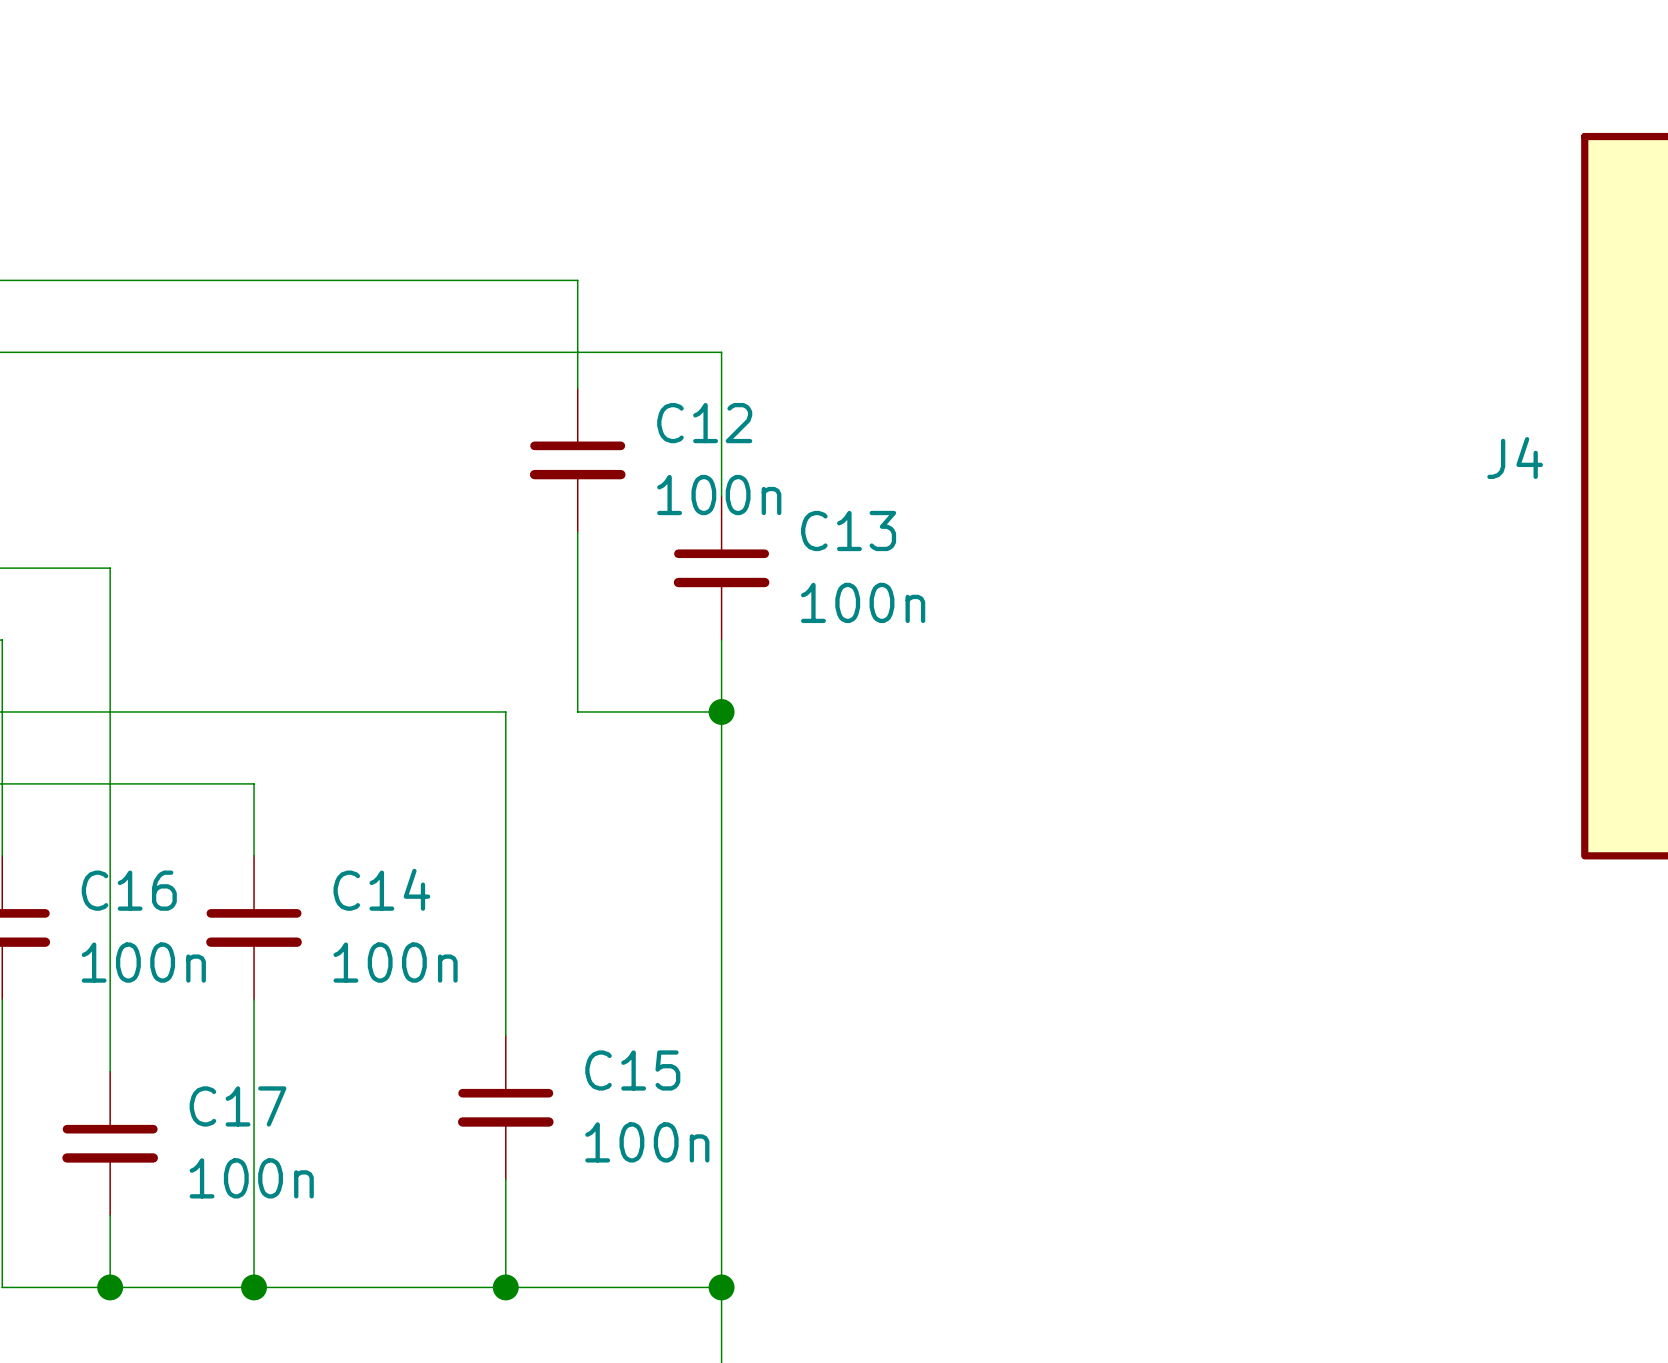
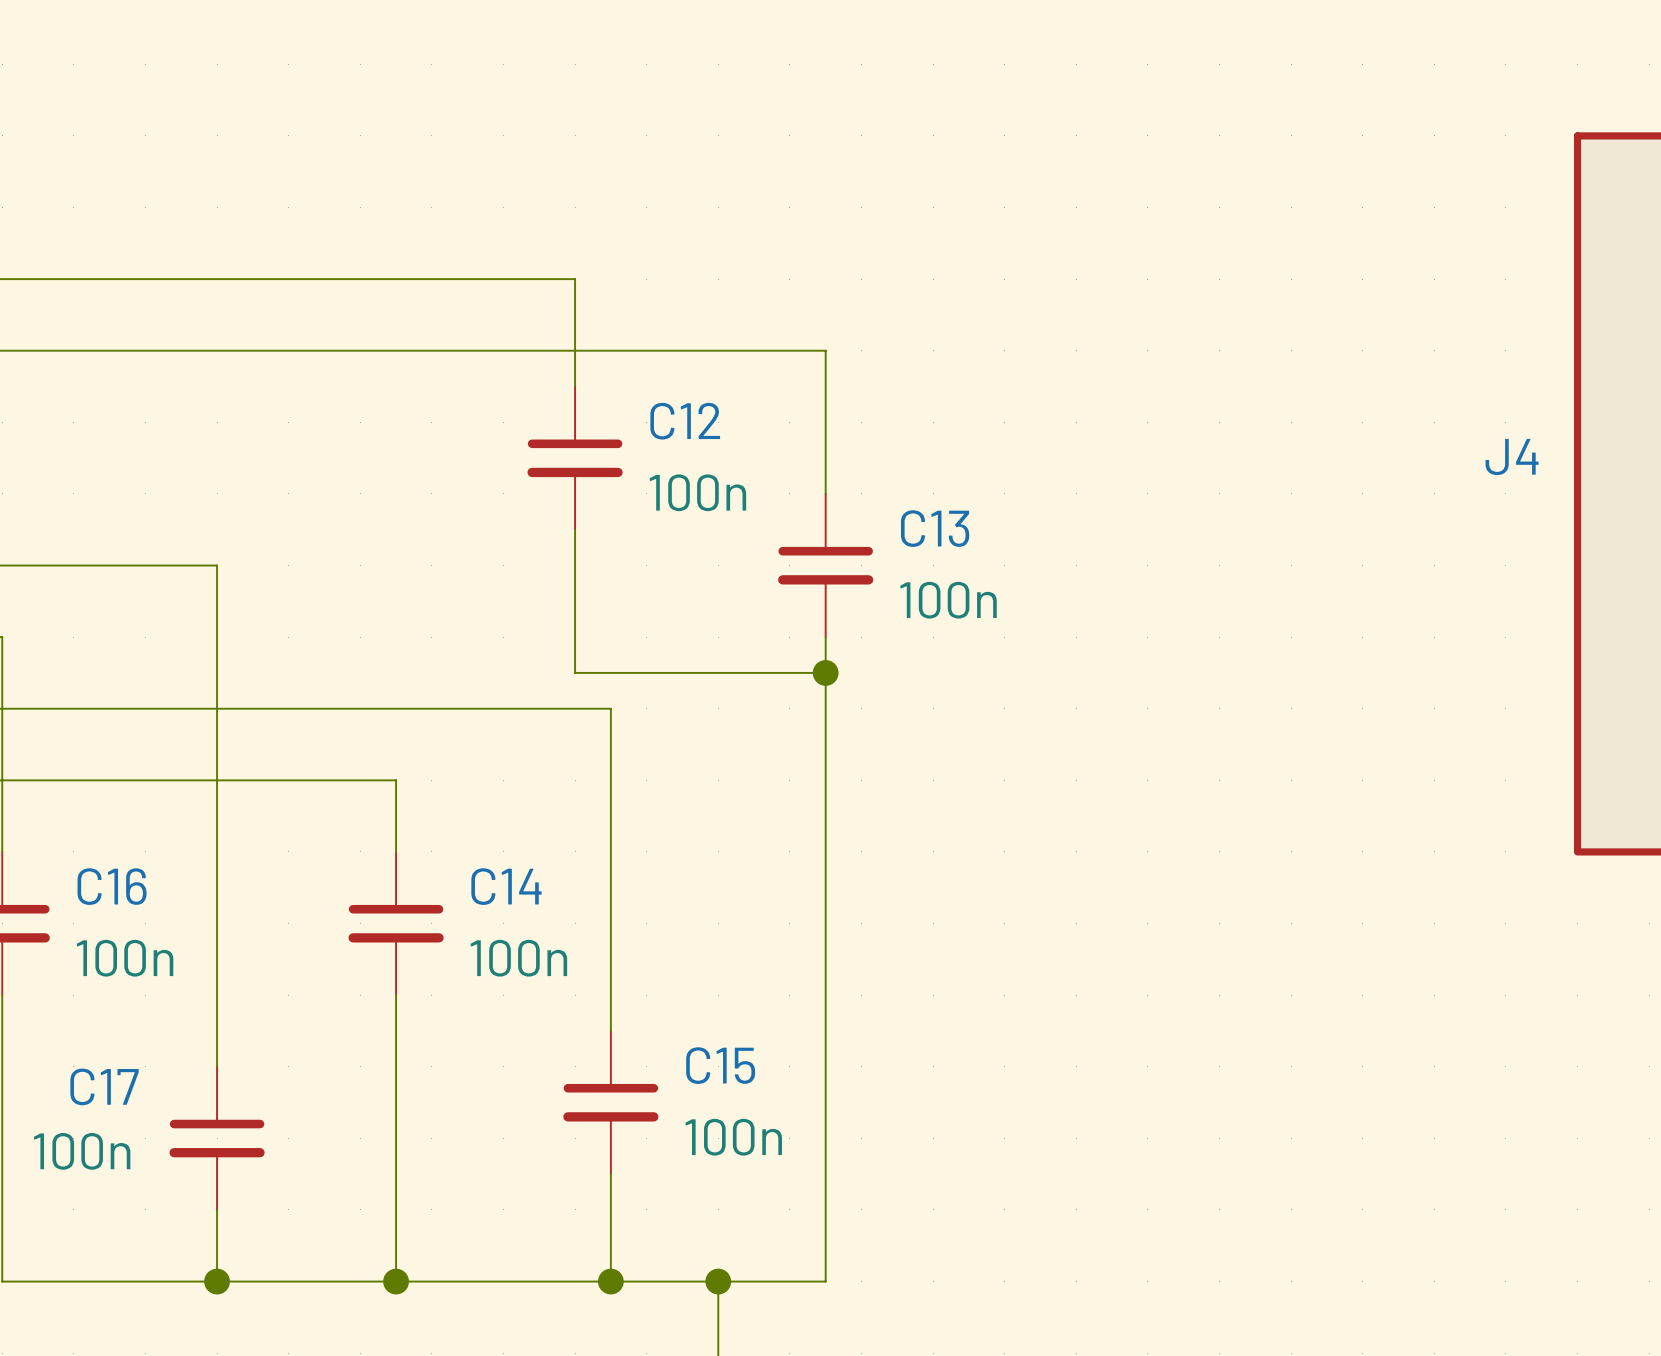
wire: (721, 352) (721, 496) -> (718, 350) (825, 350) (825, 493)
wire: (110, 568) (110, 1071) -> (109, 565) (217, 565) (217, 1066)
C13 position: (721, 568) -> (825, 565)
wire: (721, 640) (721, 1287) -> (825, 637) (825, 1281) (718, 1281)
wire: (577, 676) (577, 711) -> (503, 708) (575, 708)
wire: none -> (575, 672) (825, 672)
wire: (505, 711) (505, 1035) -> none
wire: (613, 711) (721, 711) -> (610, 708) (610, 1030)
junction position: (721, 711) -> (825, 672)
wire: (254, 783) (254, 855) -> (252, 780) (396, 780) (396, 851)
C14 position: (254, 927) -> (396, 923)
wire: (254, 999) (254, 1287) -> (396, 995) (396, 1281)
C17 name position: C17 (238, 1106) -> C17 (104, 1086)
C15 position: (505, 1107) -> (610, 1102)
C17 position: (110, 1143) -> (217, 1138)
C17 value position: 100n (251, 1178) -> 100n (82, 1151)
wire: (505, 1179) (505, 1287) -> (610, 1174) (610, 1281)
wire: (110, 1215) (110, 1287) -> (217, 1209) (217, 1281)
junction: (110, 1287) -> none
junction position: (254, 1287) -> (217, 1281)
junction: none -> (396, 1281)
junction: (505, 1287) -> none
junction: none -> (610, 1281)

